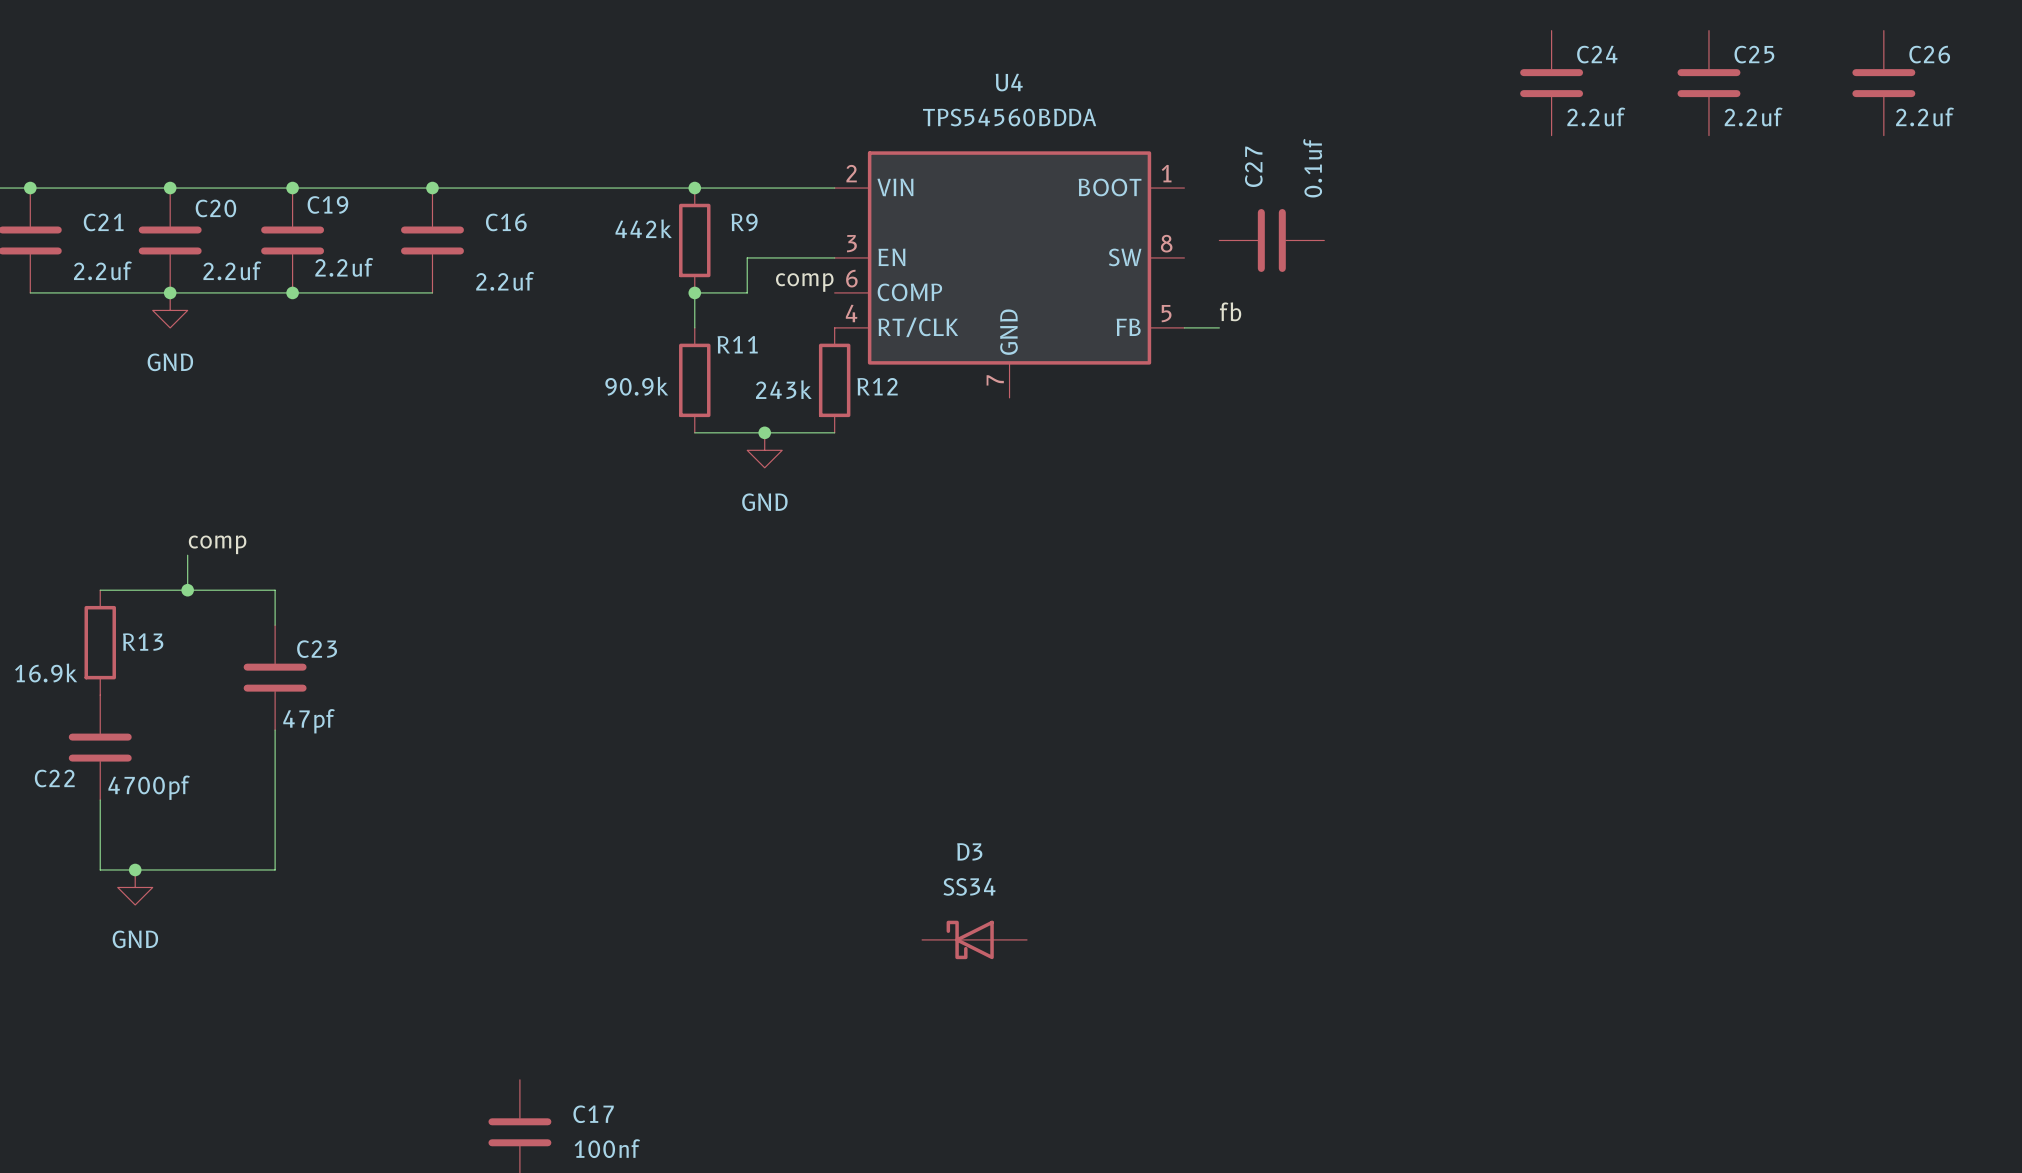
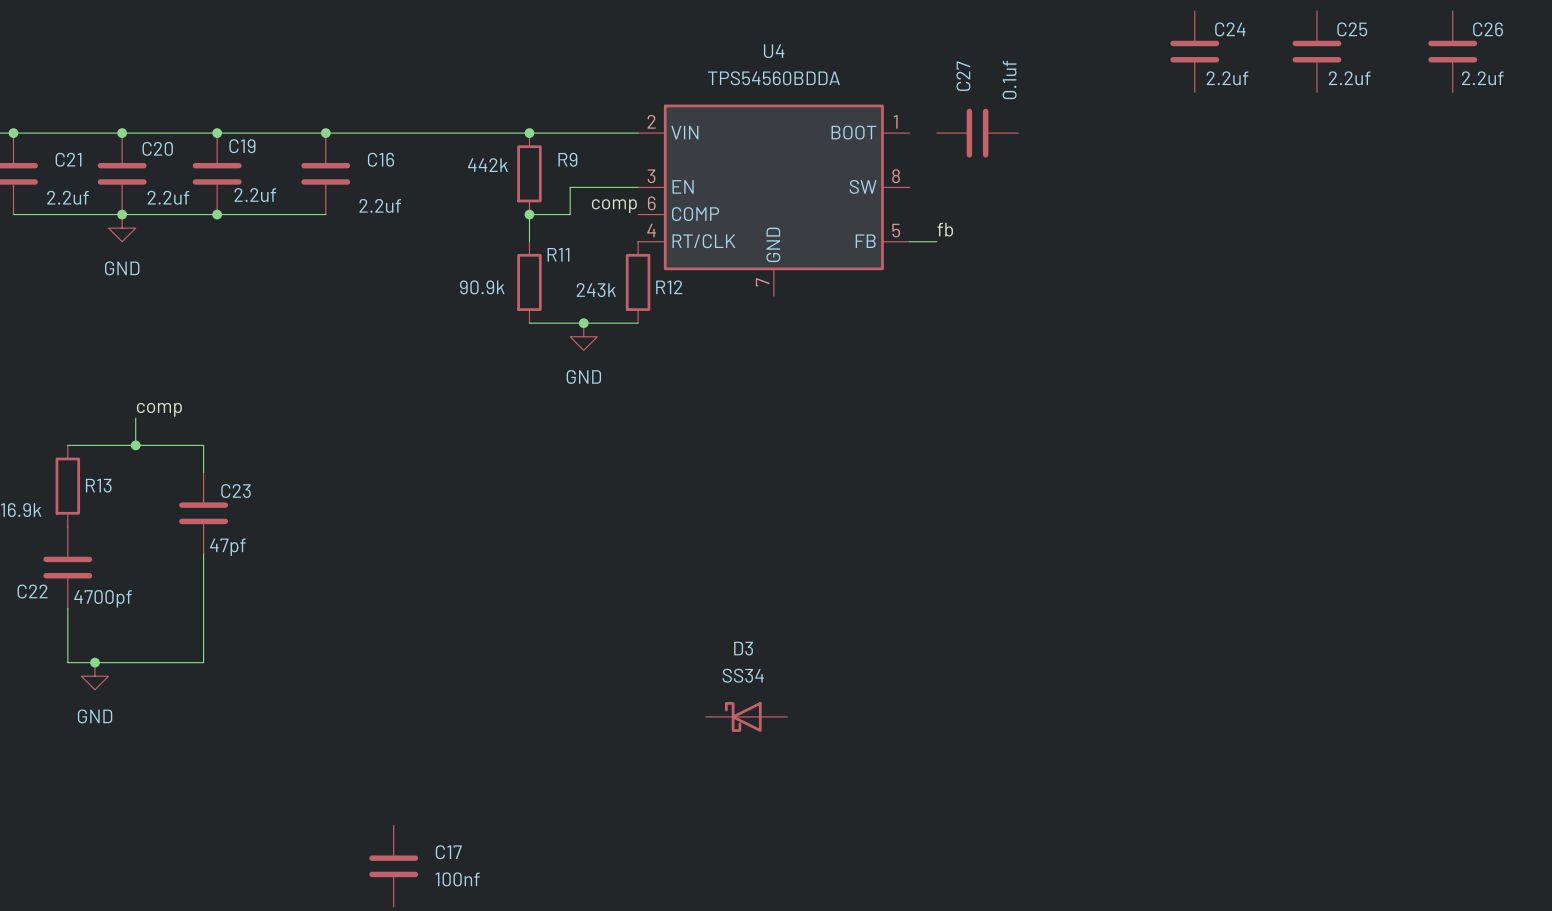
C27 position: (1271, 240) -> (977, 133)

